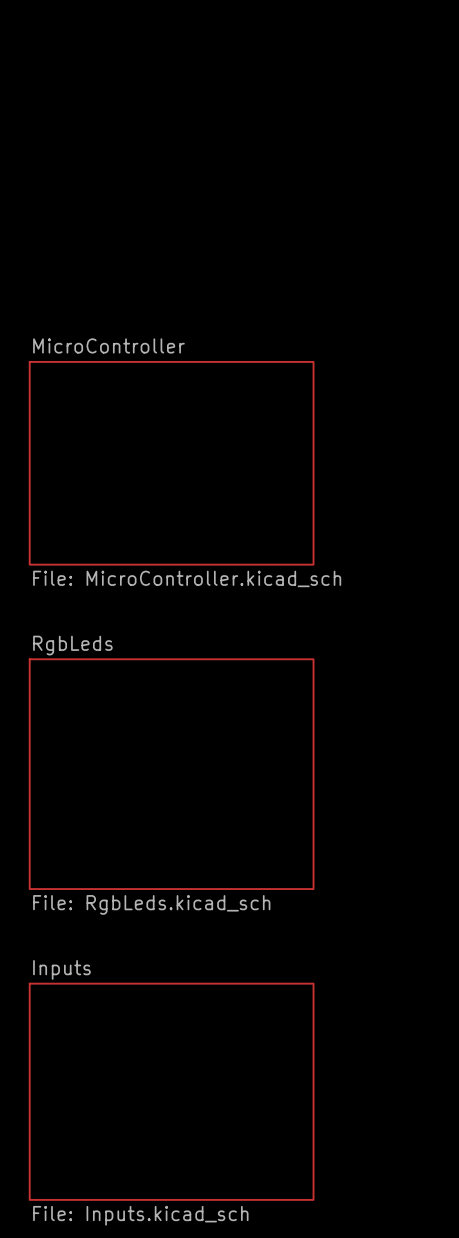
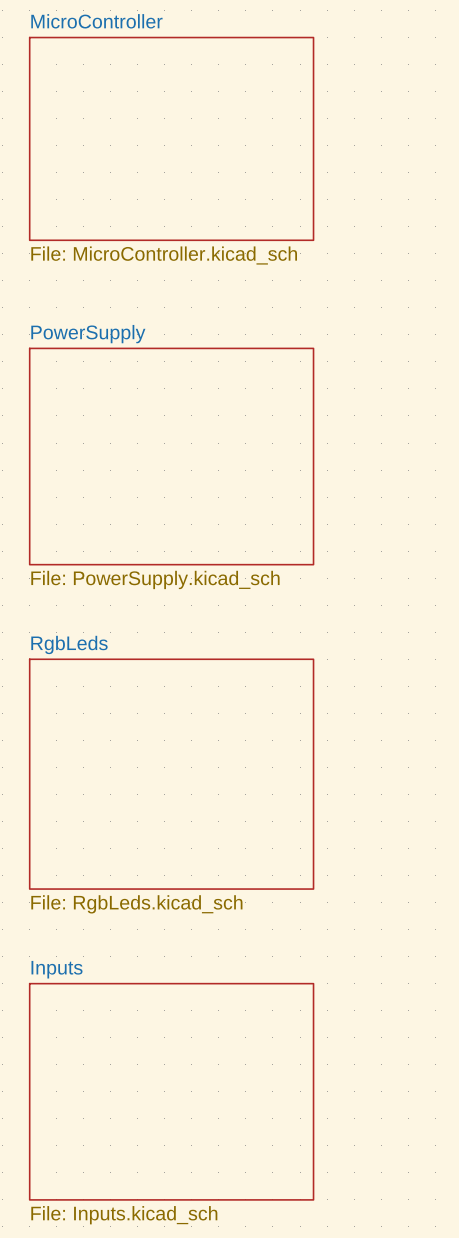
sheet MicroController: none -> File: MicroController.kicad_sch (171, 138)
sheet PowerSupply: none -> File: PowerSupply.kicad_sch (171, 456)
sheet MicroController: File: MicroController.kicad_sch (171, 463) -> none

